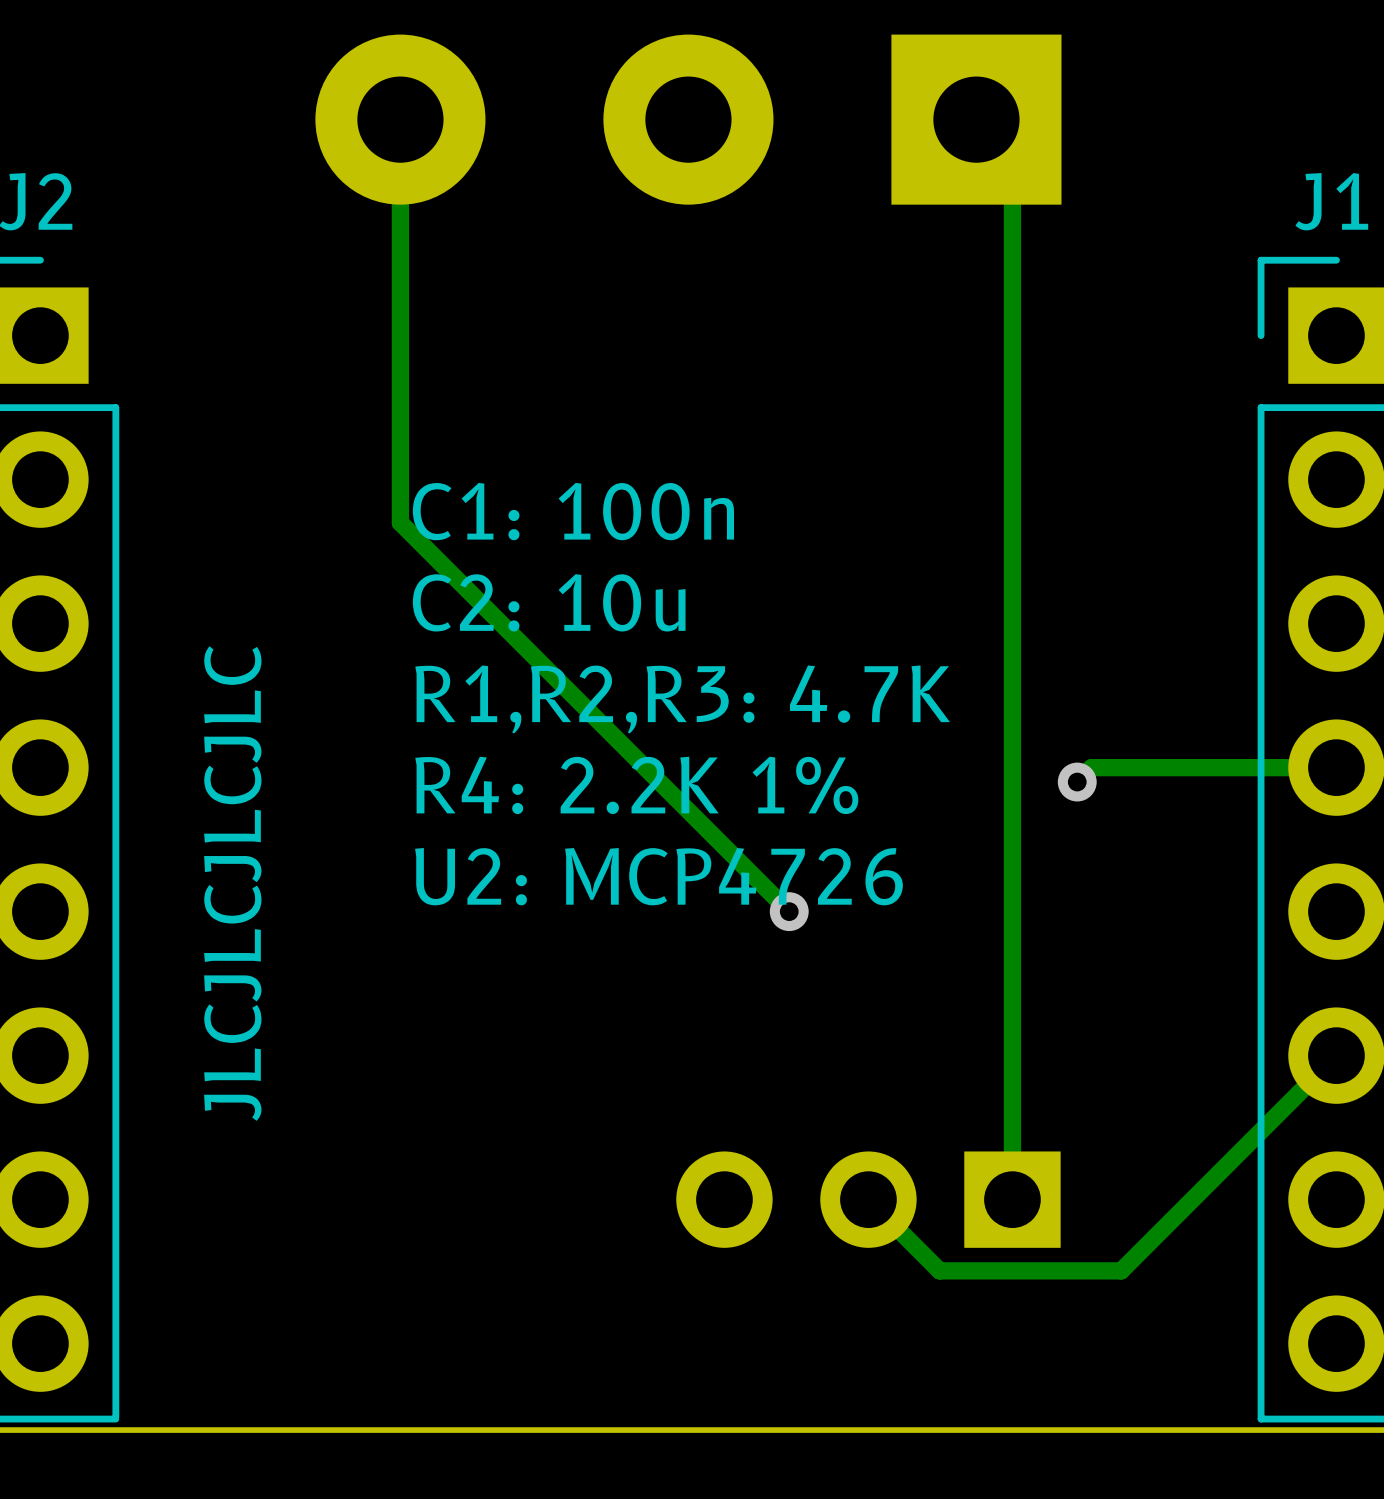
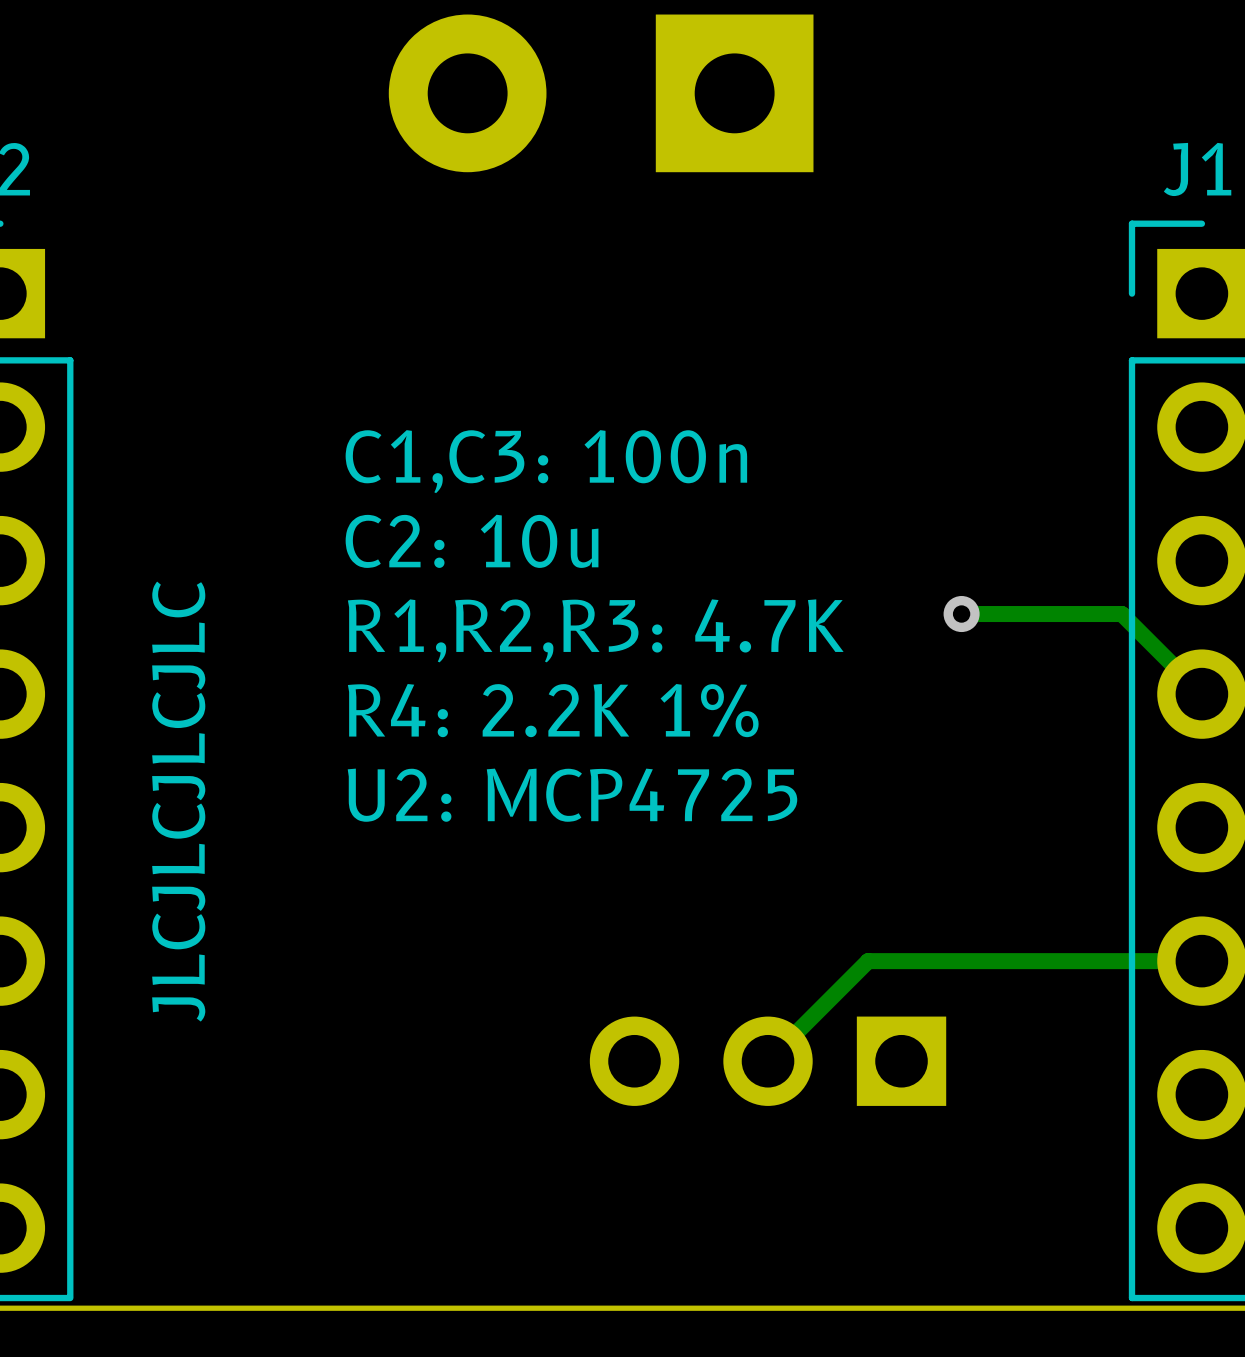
part footprint: [315, 34, 1062, 205] -> [388, 14, 814, 173]
track: (400, 119) (400, 522) (789, 911) -> none
track: (976, 119) (1012, 155) (1012, 1199) -> none
text: C1: 100n (573, 511) -> C1,C3: 100n (546, 461)
track: (1336, 767) (1091, 767) (1077, 782) -> (1201, 694) (1121, 614) (961, 614)
via position: (1077, 782) -> (961, 614)
text: U2: MCP4726 (658, 876) -> U2: MCP4725 (572, 795)
via: (789, 911) -> none
track: (1336, 1055) (1121, 1270) (939, 1270) (868, 1199) -> (1201, 961) (868, 961) (768, 1061)
part position: (868, 1199) -> (768, 1061)

